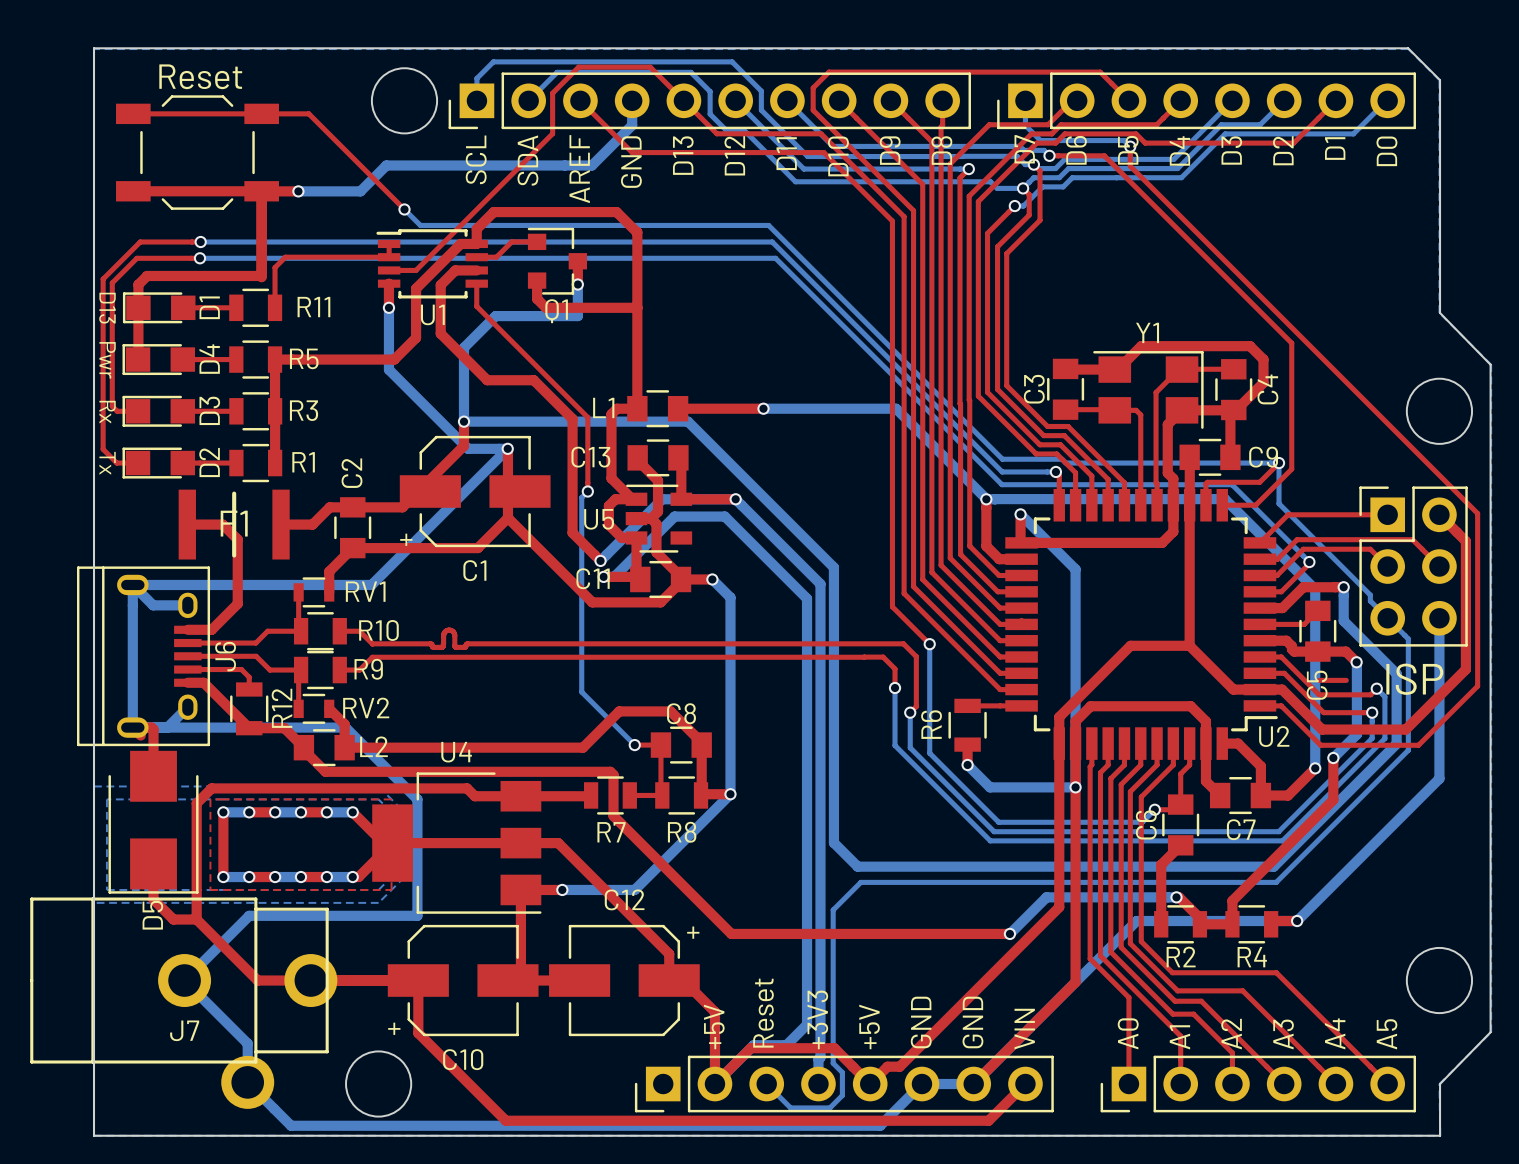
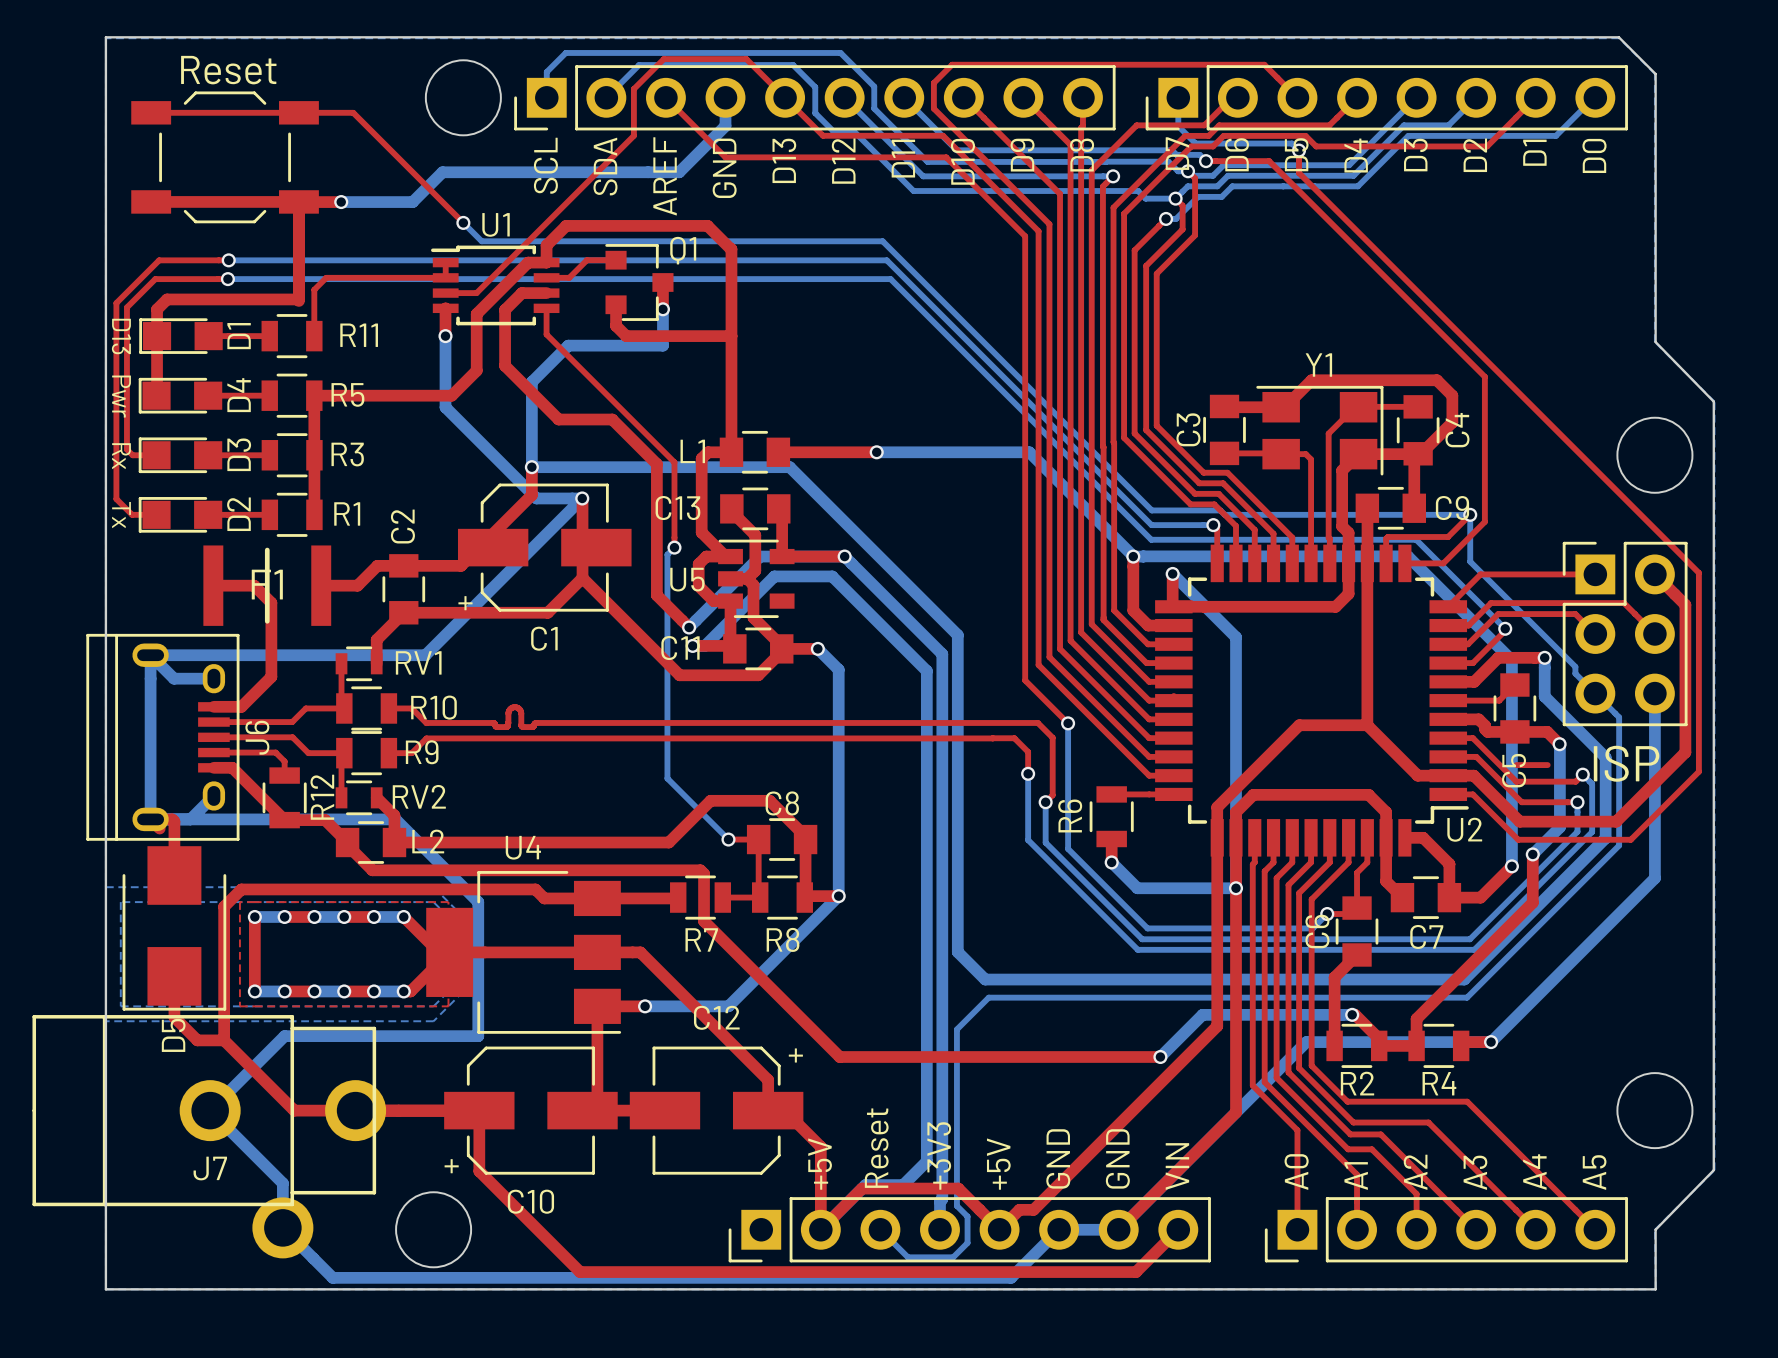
Q1 name position: Q1 (556, 311) -> Q1 (683, 250)
U1 name position: U1 (432, 314) -> U1 (496, 224)

